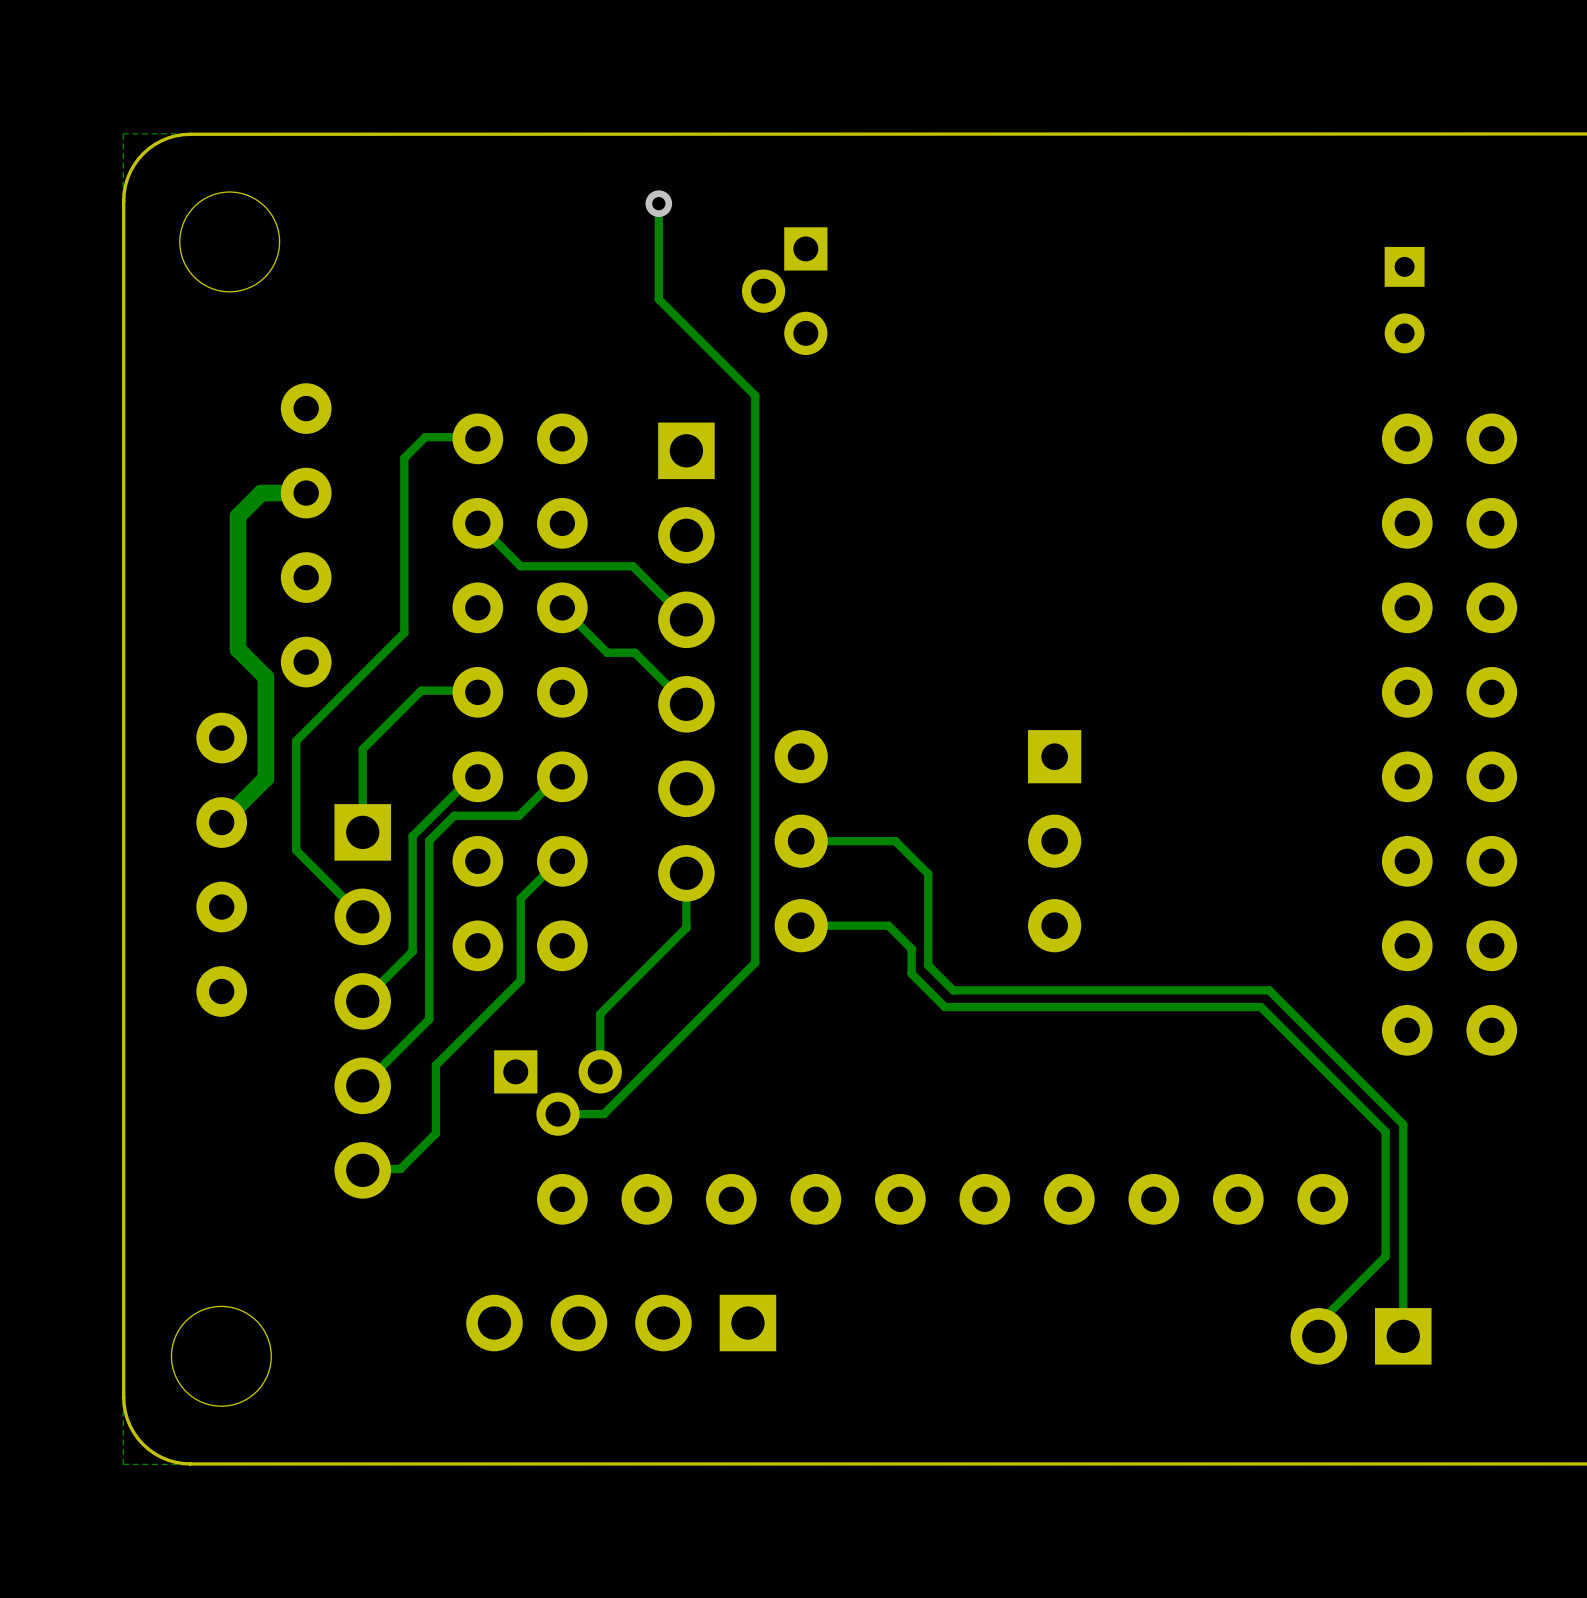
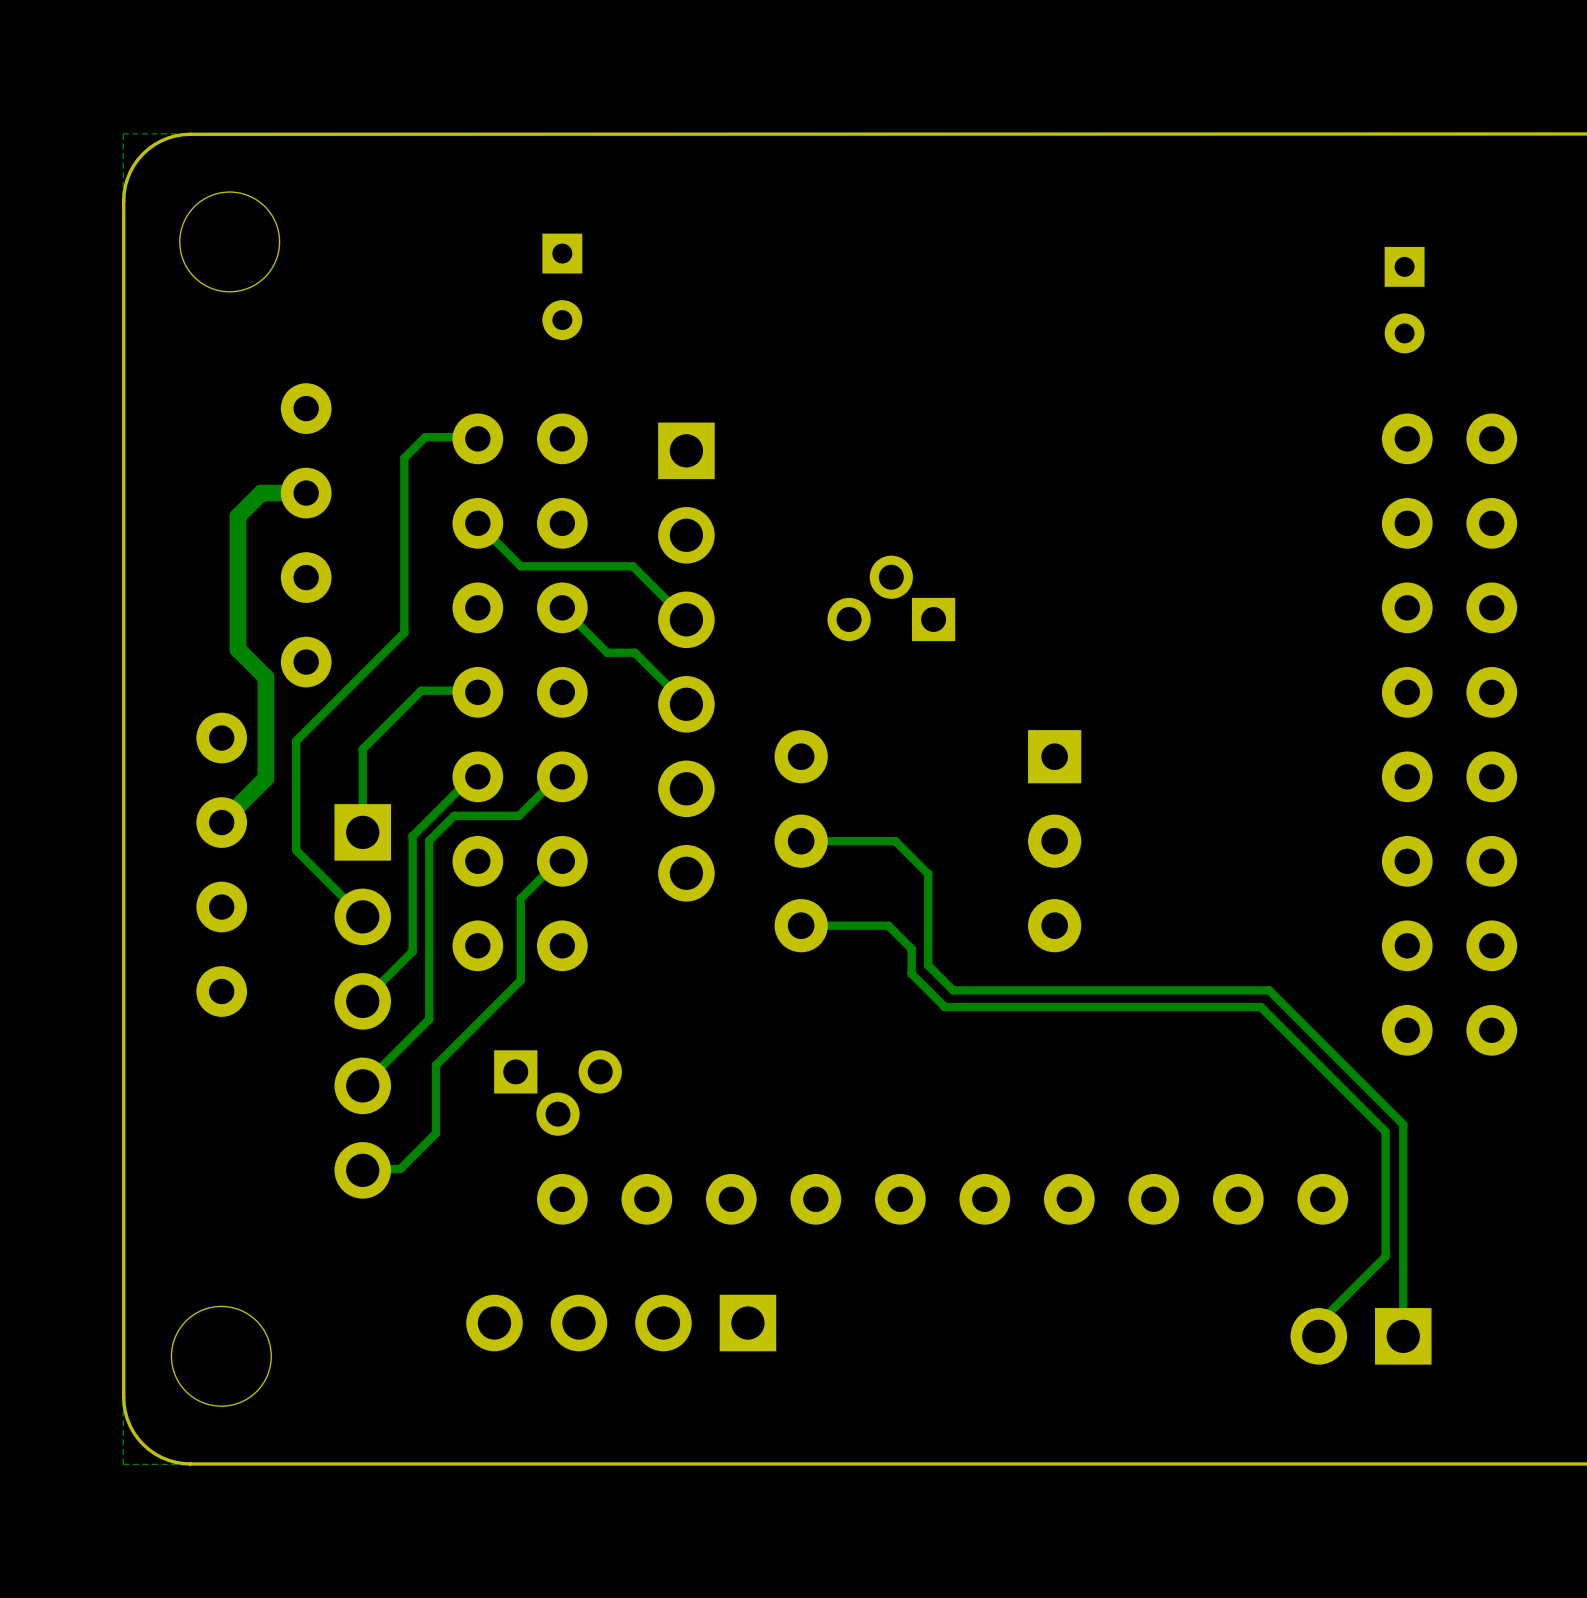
track: (658, 203) (658, 299) (755, 395) (755, 962) (603, 1114) (558, 1114) -> none
via: (658, 203) -> none
part: none -> (562, 286)
part rotation: 0° (784, 291) -> 90° clockwise (891, 598)
part position: (784, 291) -> (891, 598)
track: (686, 873) (686, 927) (600, 1014) (600, 1071) -> none

